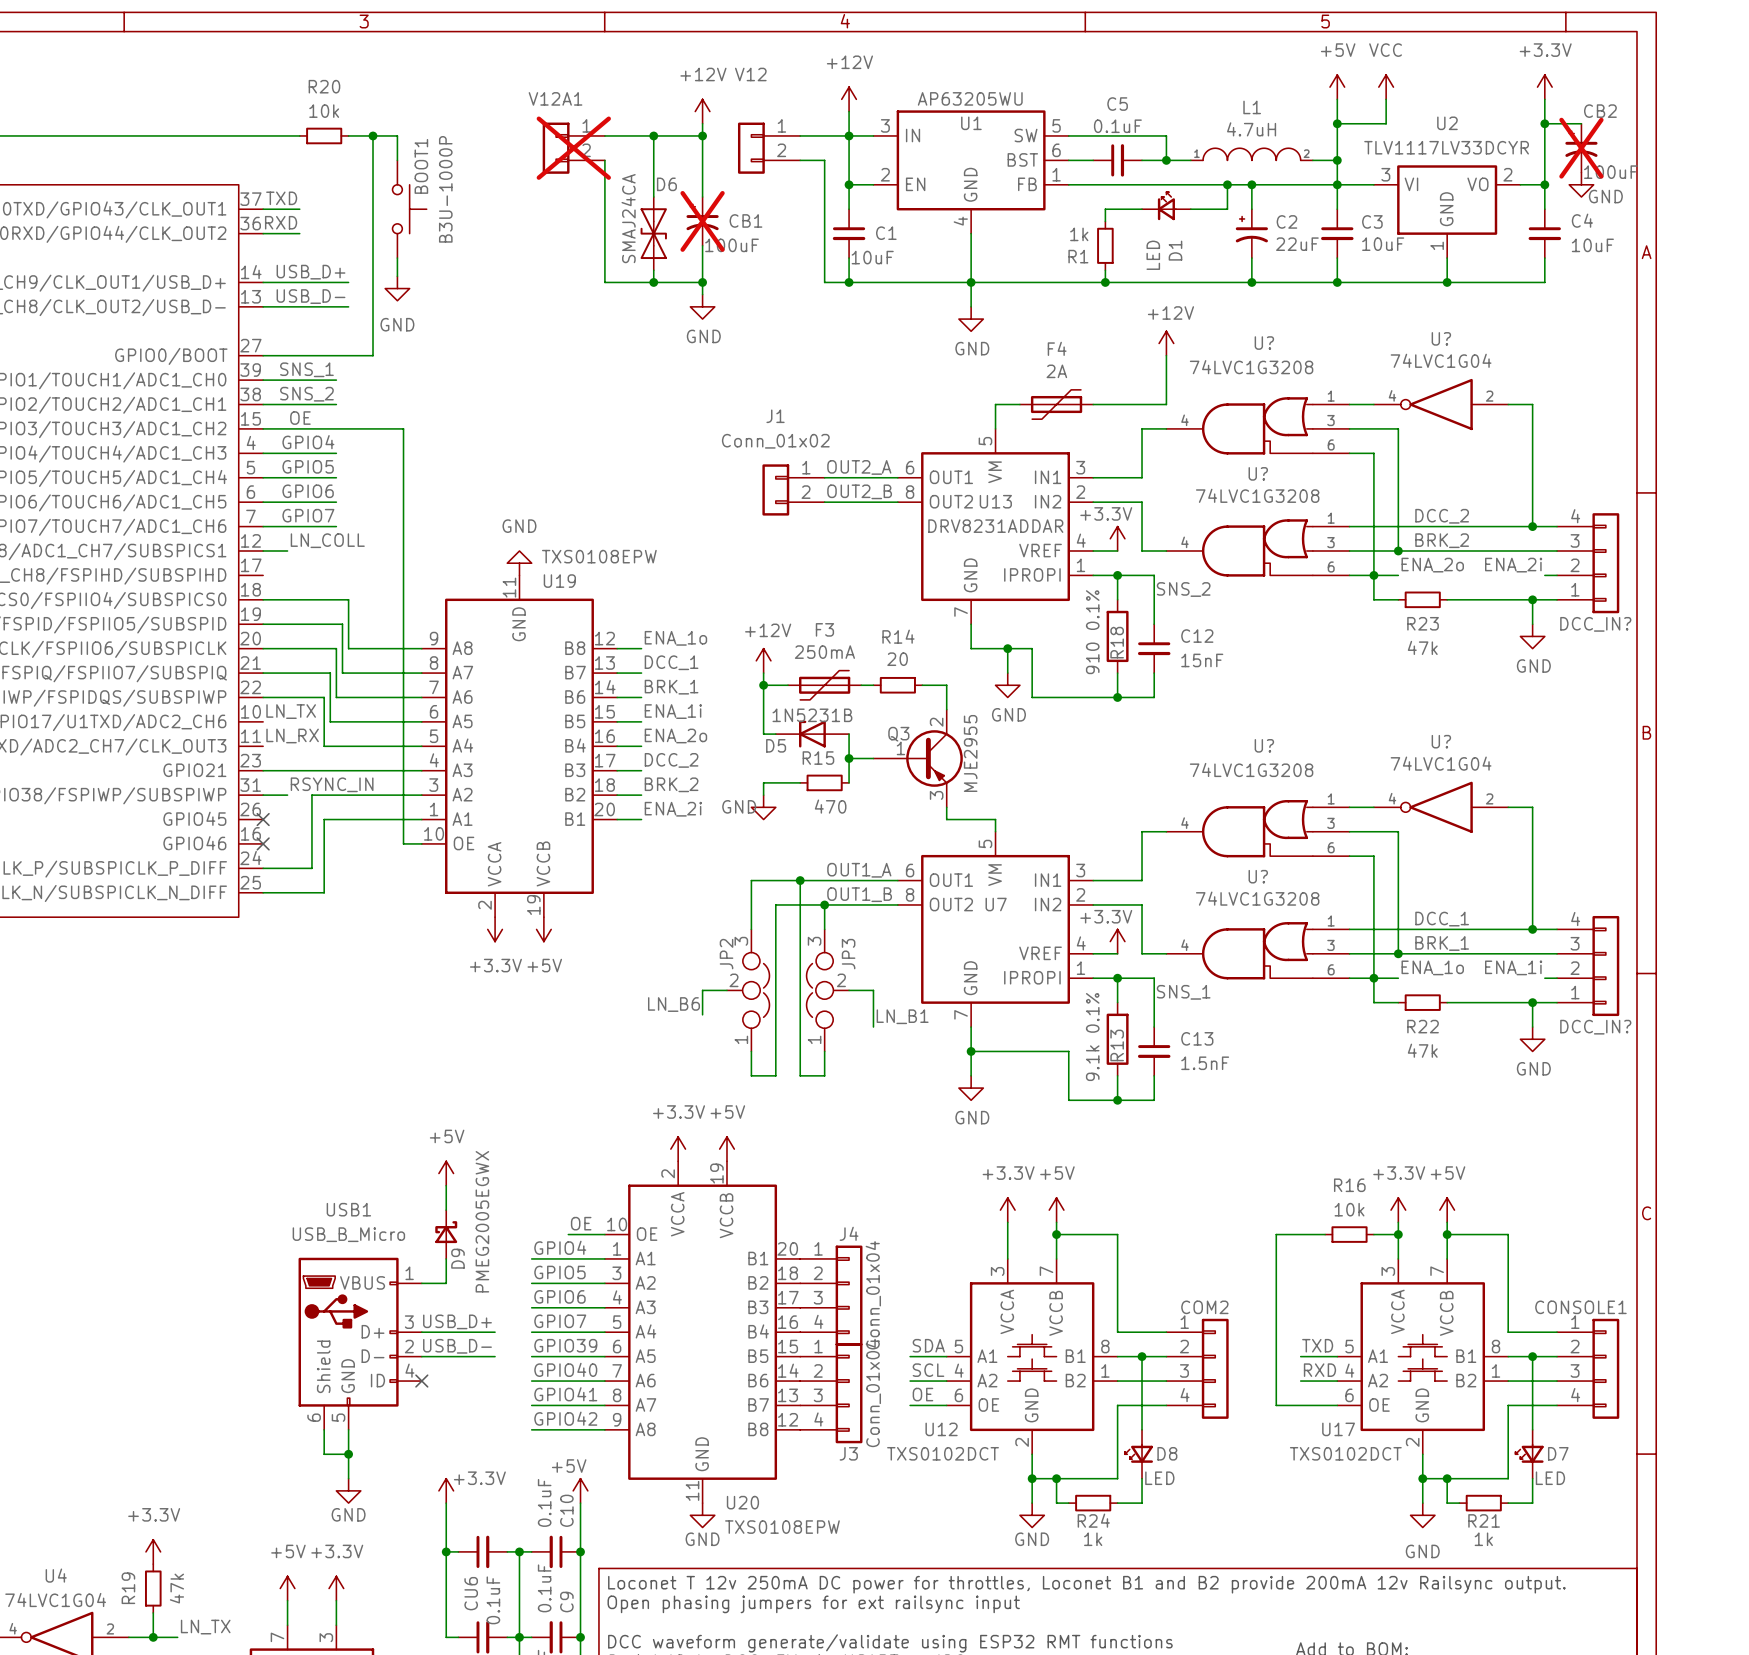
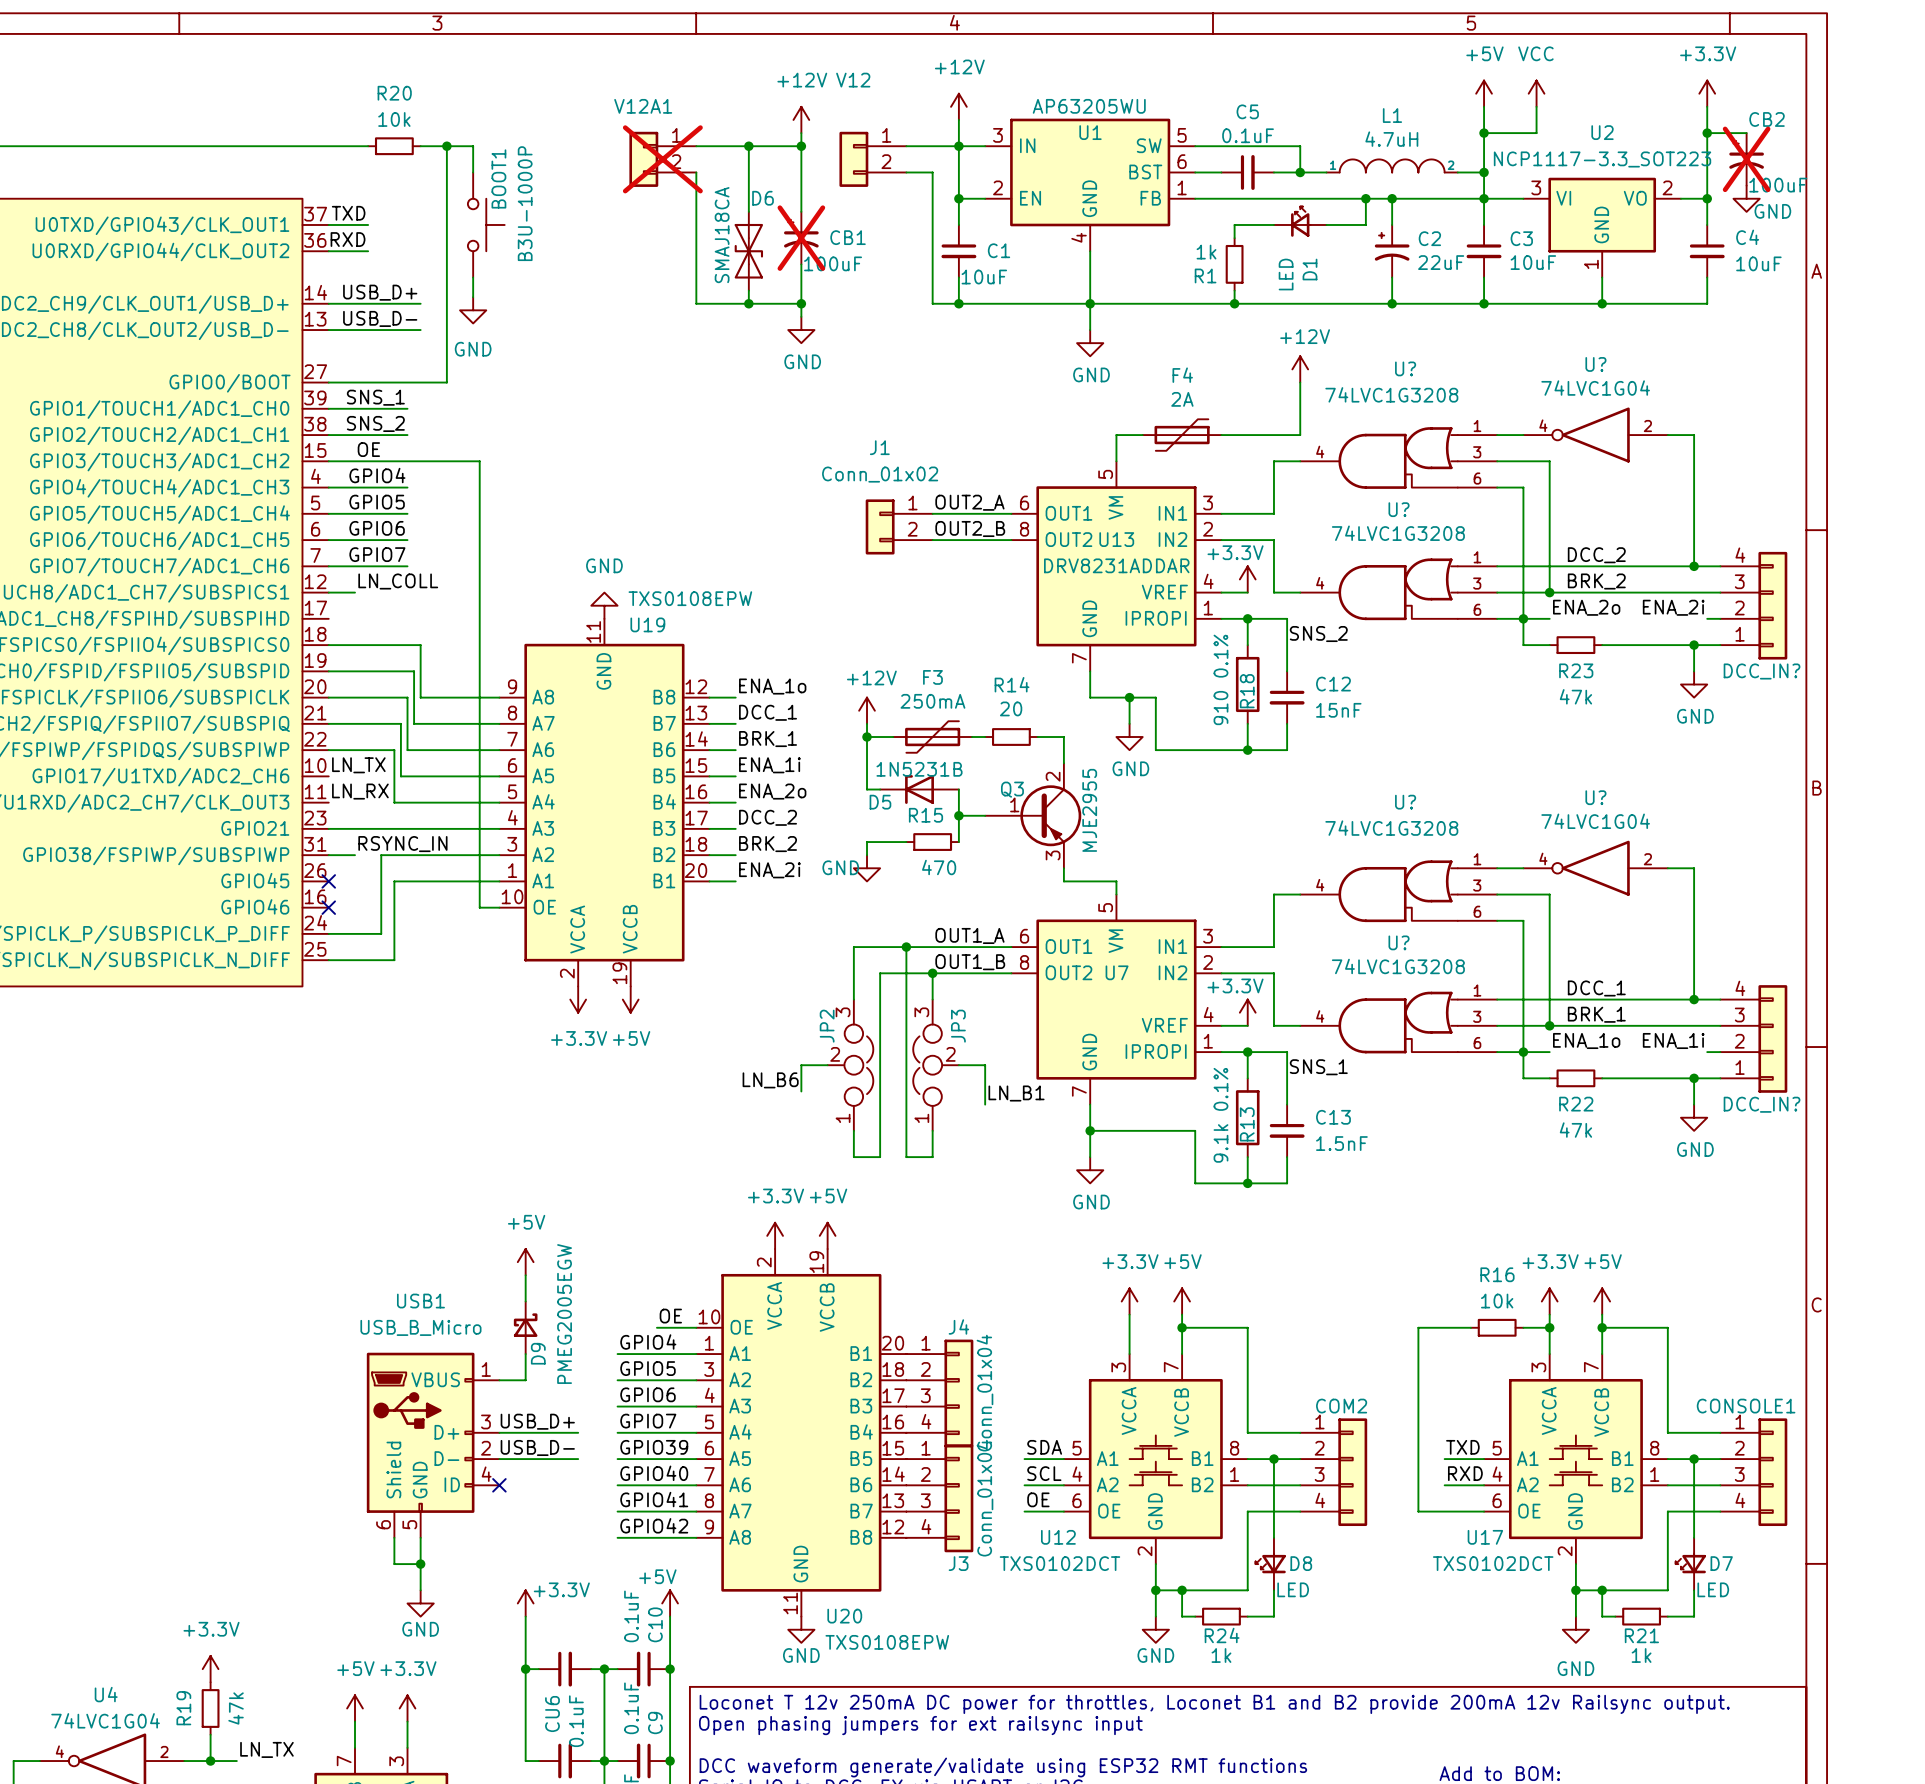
U2 value: TLV1117LV33DCYR (1446, 147) -> NCP1117-3.3_SOT223 (1602, 159)
D6 value: SMAJ24CA (628, 218) -> SMAJ18CA (722, 235)
D9 value: PMEG2005EGWX (482, 1221) -> PMEG2005EGW (564, 1314)

